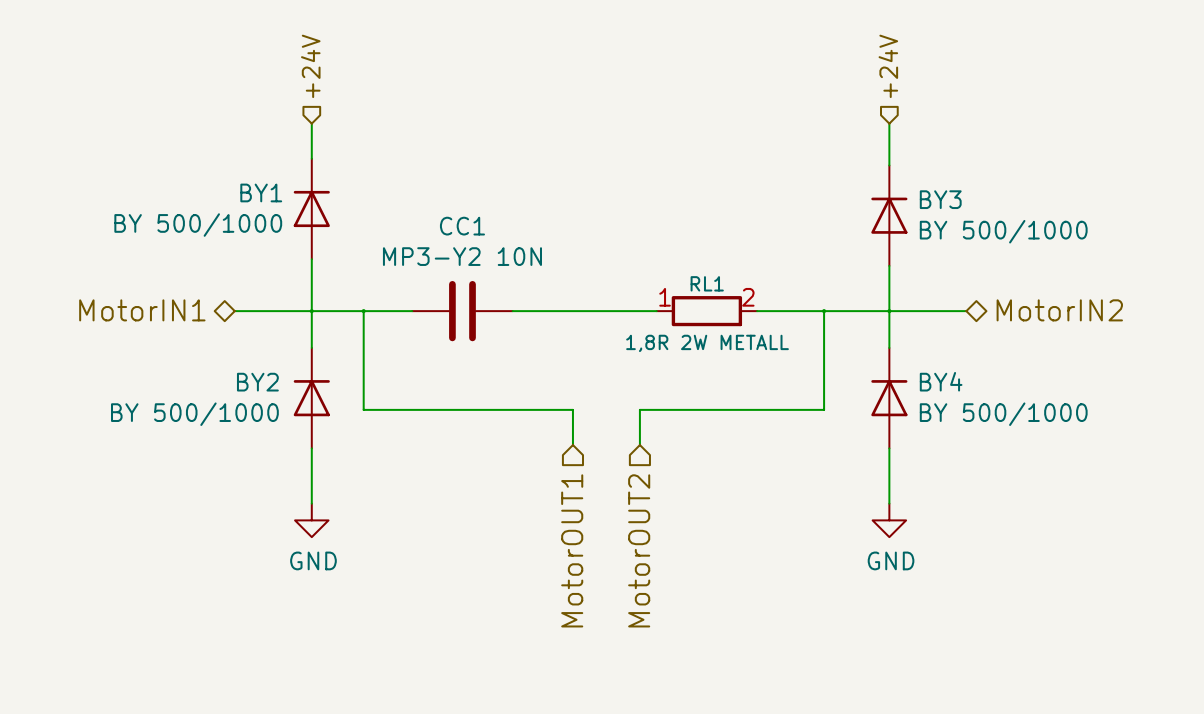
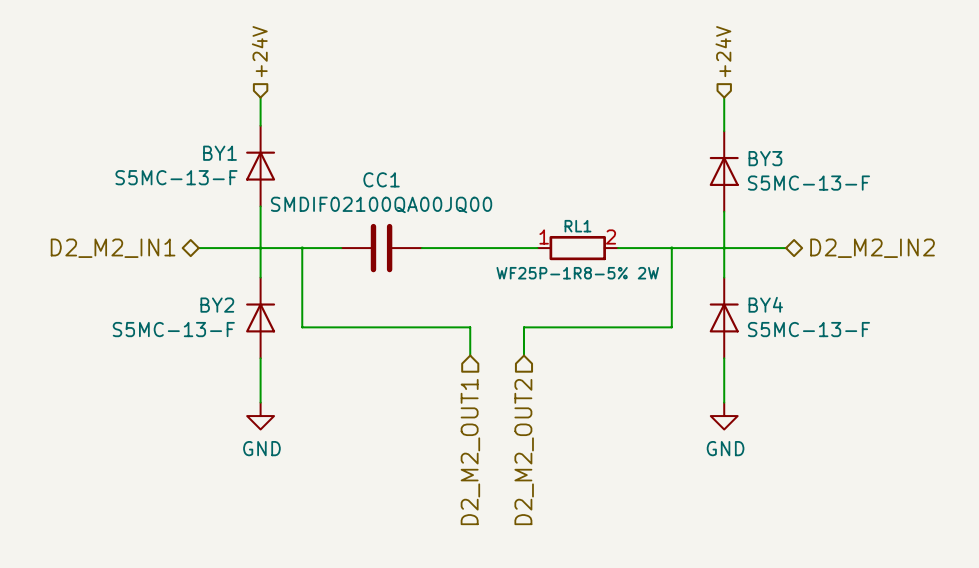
BY1 value: BY 500/1000 (198, 225) -> S5MC-13-F (176, 177)
BY3 value: BY 500/1000 (1003, 231) -> S5MC-13-F (808, 183)
CC1 value: MP3-Y2 10N (462, 256) -> SMDIF02100QA00JQ00 (381, 204)
hierarchical label: MotorIN1 (142, 310) -> D2_M2_IN1 (113, 248)
hierarchical label: MotorIN2 (1059, 310) -> D2_M2_IN2 (872, 248)
RL1 value: 1,8R 2W METALL (707, 343) -> WF25P-1R8-5% 2W (577, 273)
BY2 value: BY 500/1000 (194, 414) -> S5MC-13-F (173, 329)
BY4 value: BY 500/1000 (1003, 414) -> S5MC-13-F (808, 329)
hierarchical label: MotorOUT1 (572, 550) -> D2_M2_OUT1 (470, 452)
hierarchical label: MotorOUT2 (639, 550) -> D2_M2_OUT2 (524, 452)

